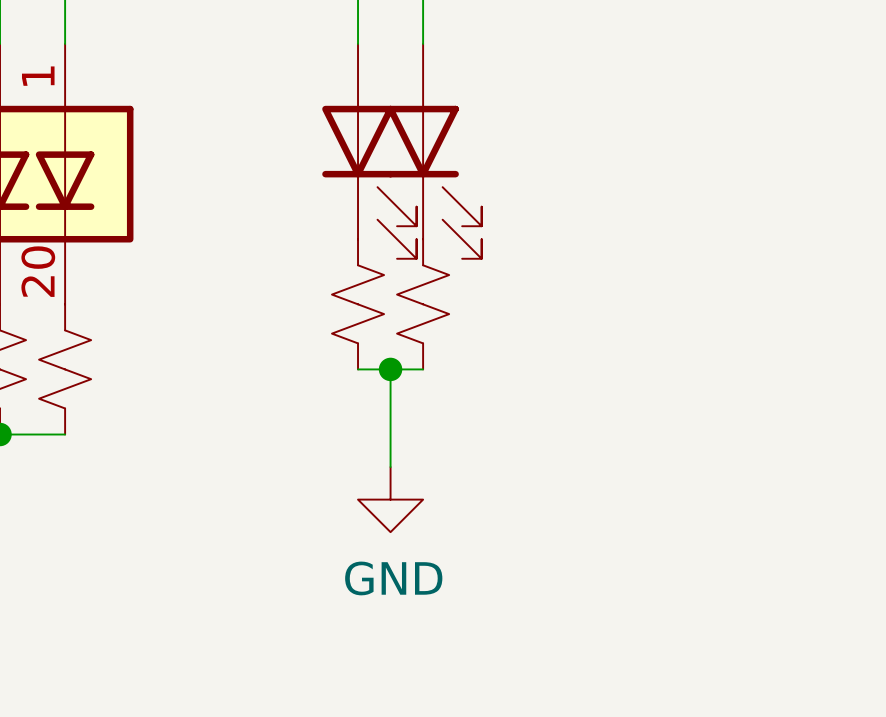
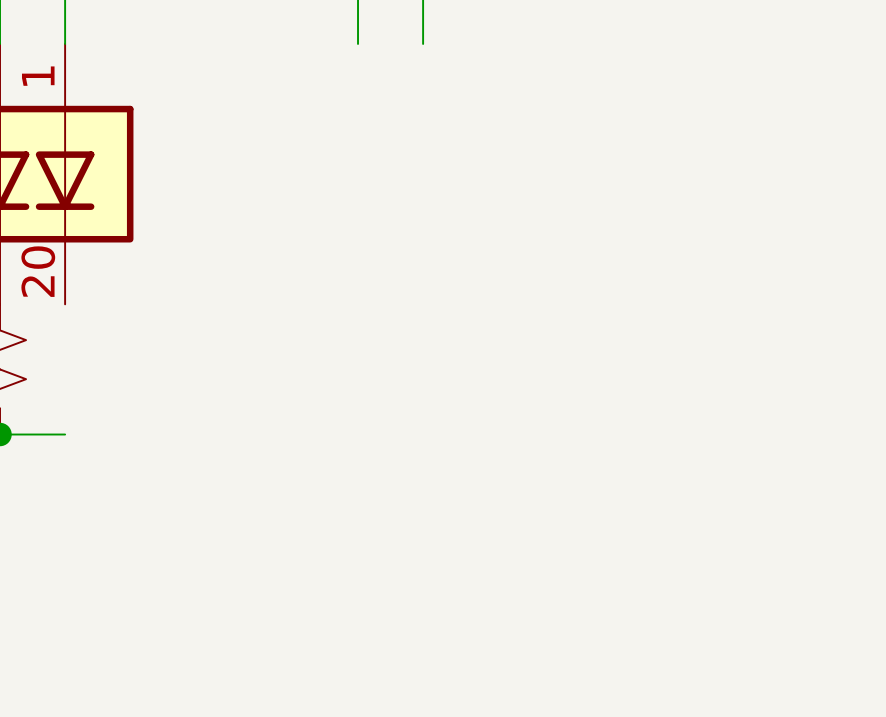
part: (369, 151) -> none
part: (434, 151) -> none
part: (358, 304) -> none
part: (423, 304) -> none
part: (65, 369) -> none
wire: (358, 369) (423, 369) -> none
wire: (390, 369) (390, 467) -> none
junction: (390, 369) -> none
power symbol: GND (390, 499) -> none

